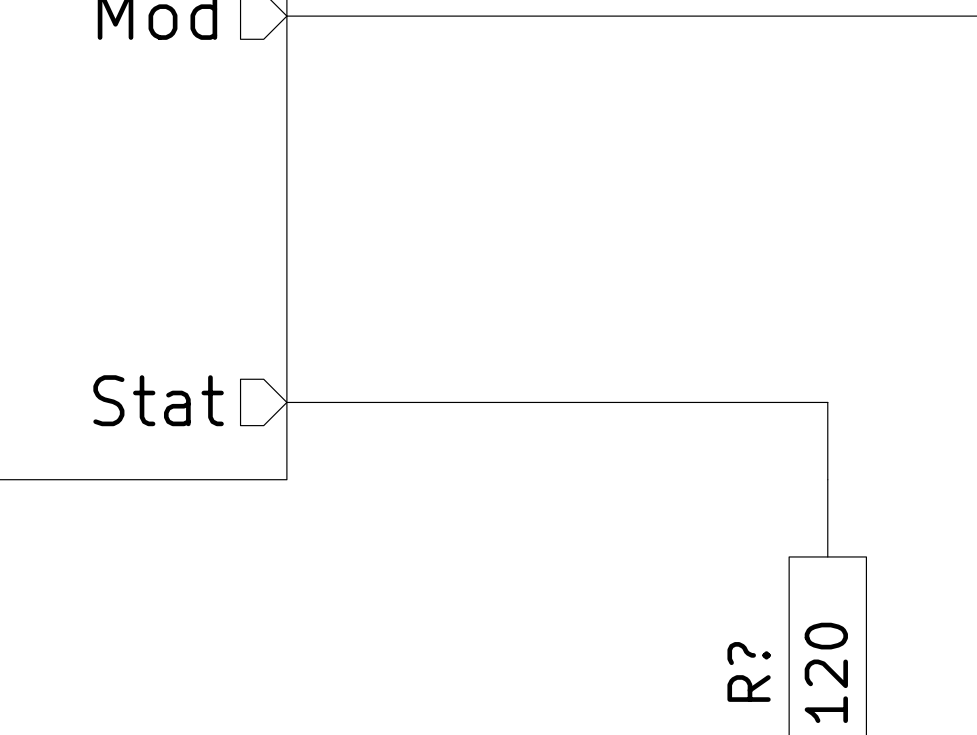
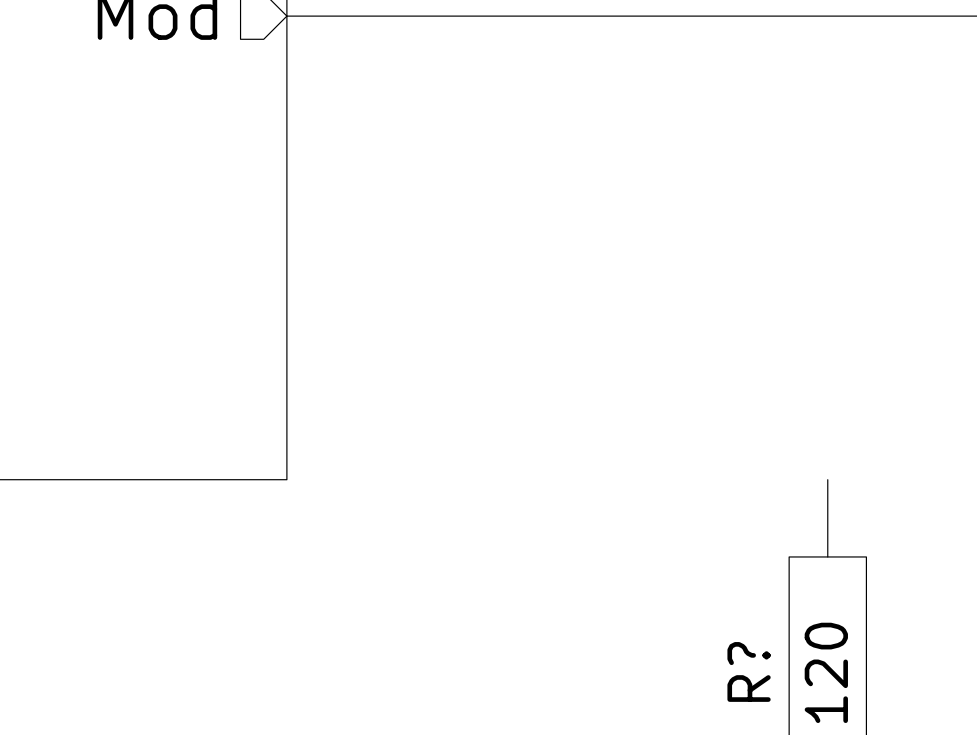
sheet pin: Stat (158, 400) -> none
wire: (286, 402) (827, 402) (827, 479) -> none

